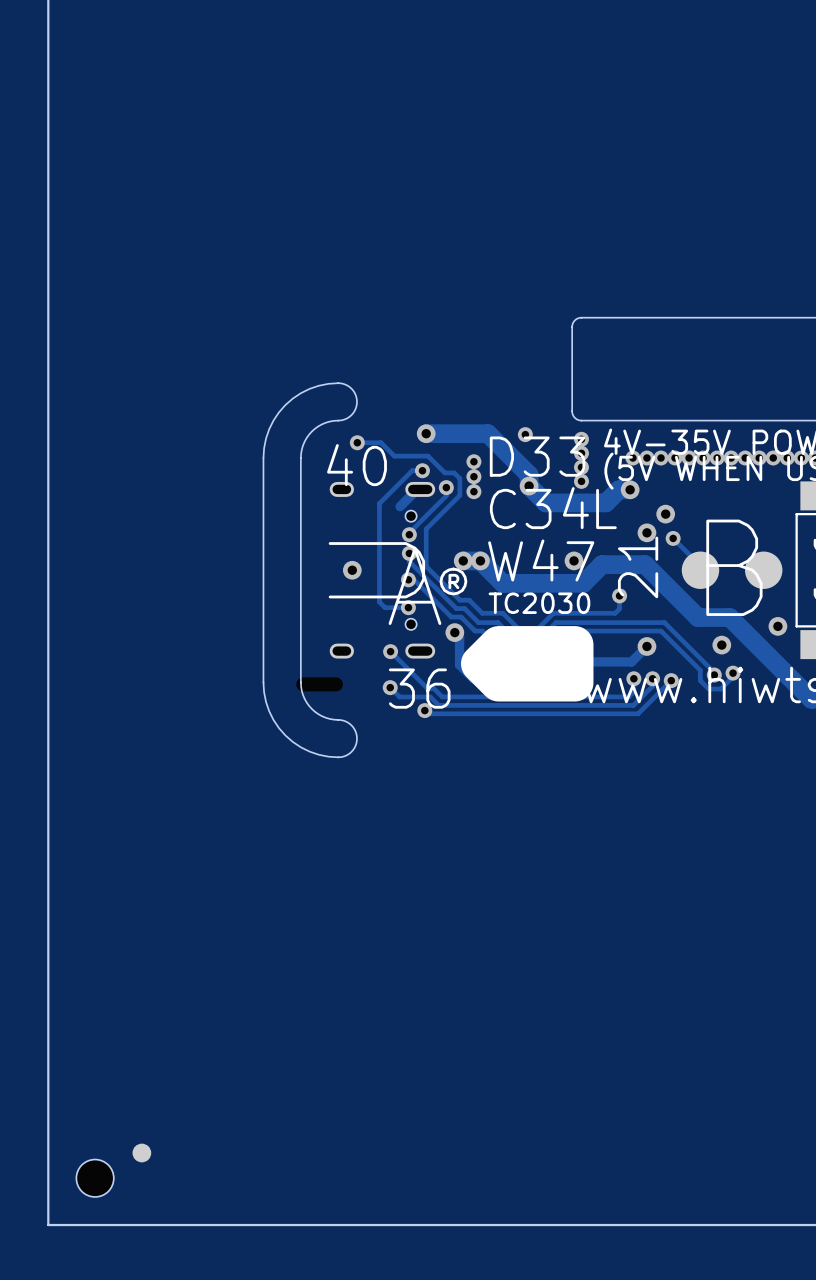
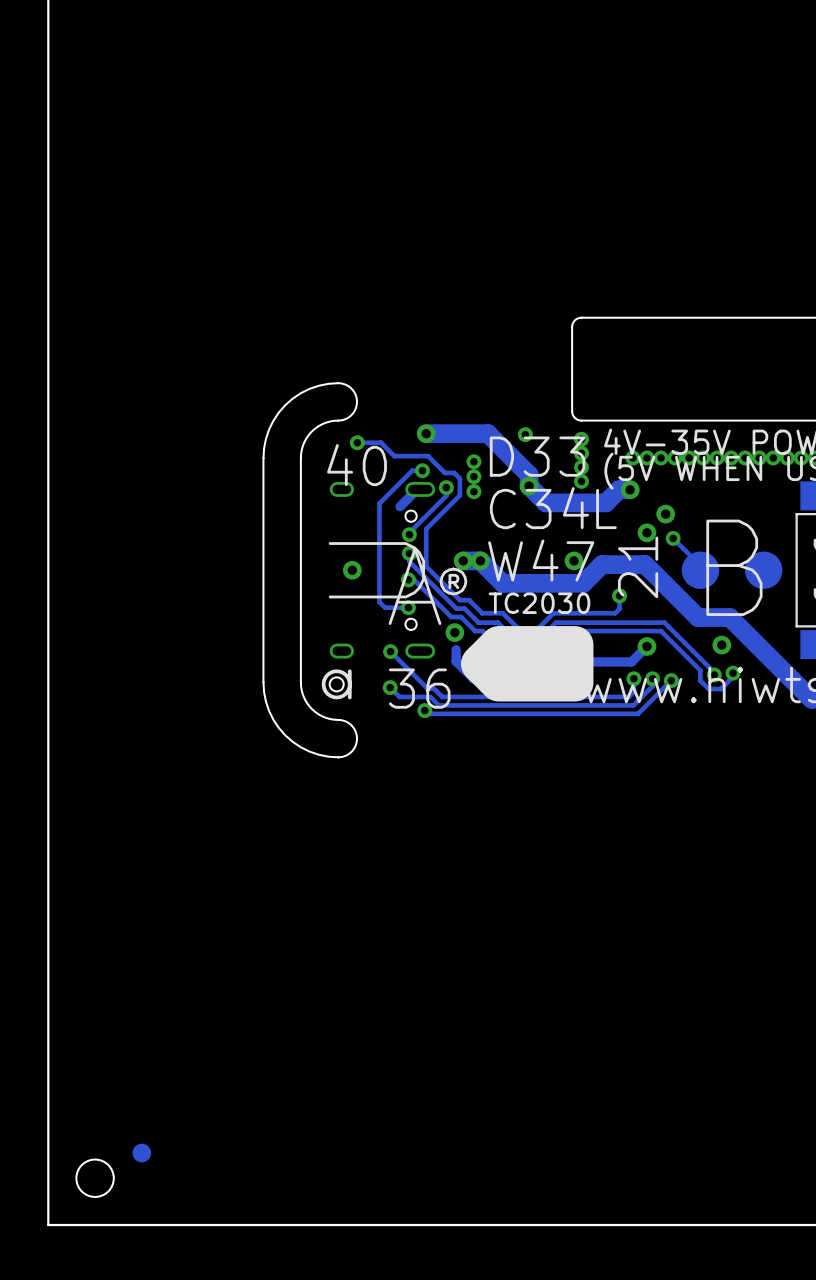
via: (777, 626) -> none
track: (454, 632) (459, 637) (459, 664) -> (456, 649) (456, 661) (459, 664)
part footprint: [296, 677, 343, 692] -> [321, 669, 352, 700]

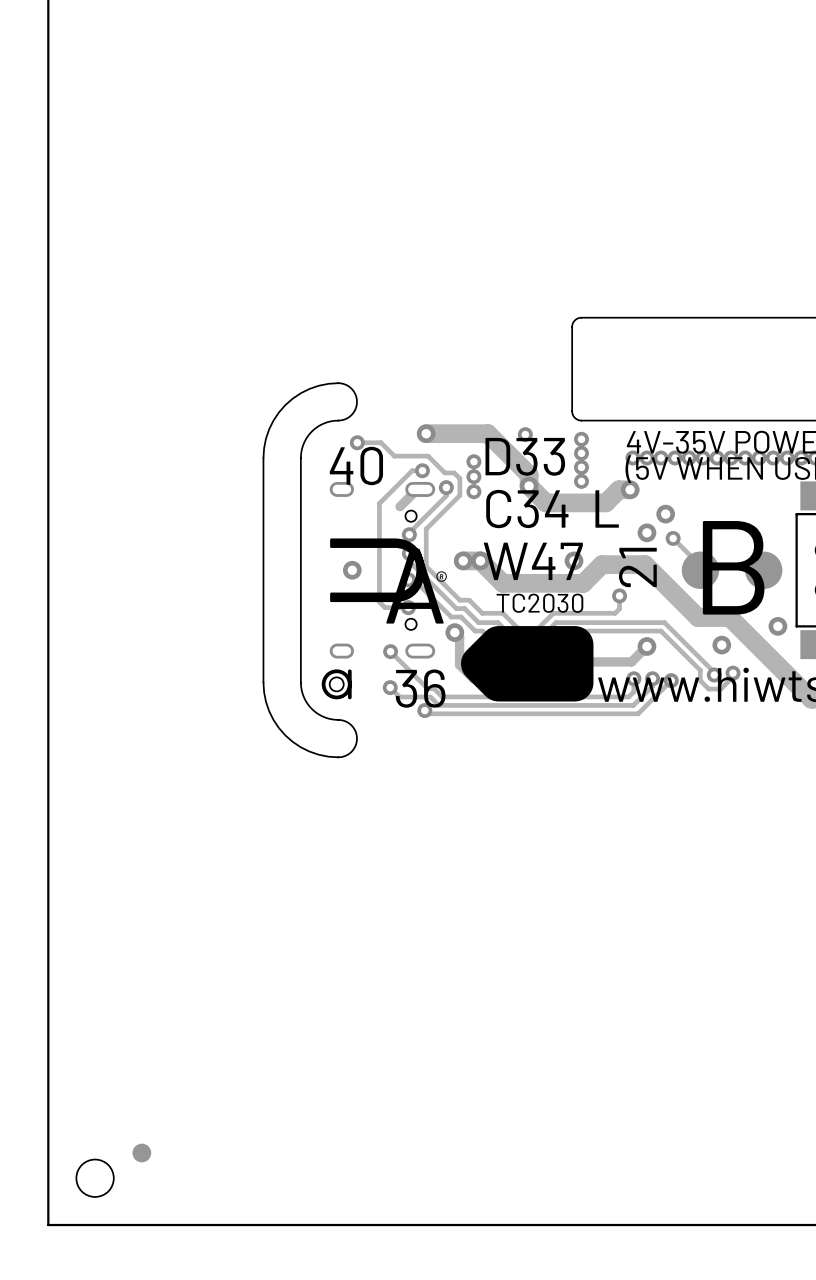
via: none -> (777, 626)
track: (456, 649) (456, 661) (459, 664) -> (454, 632) (459, 637) (459, 664)

